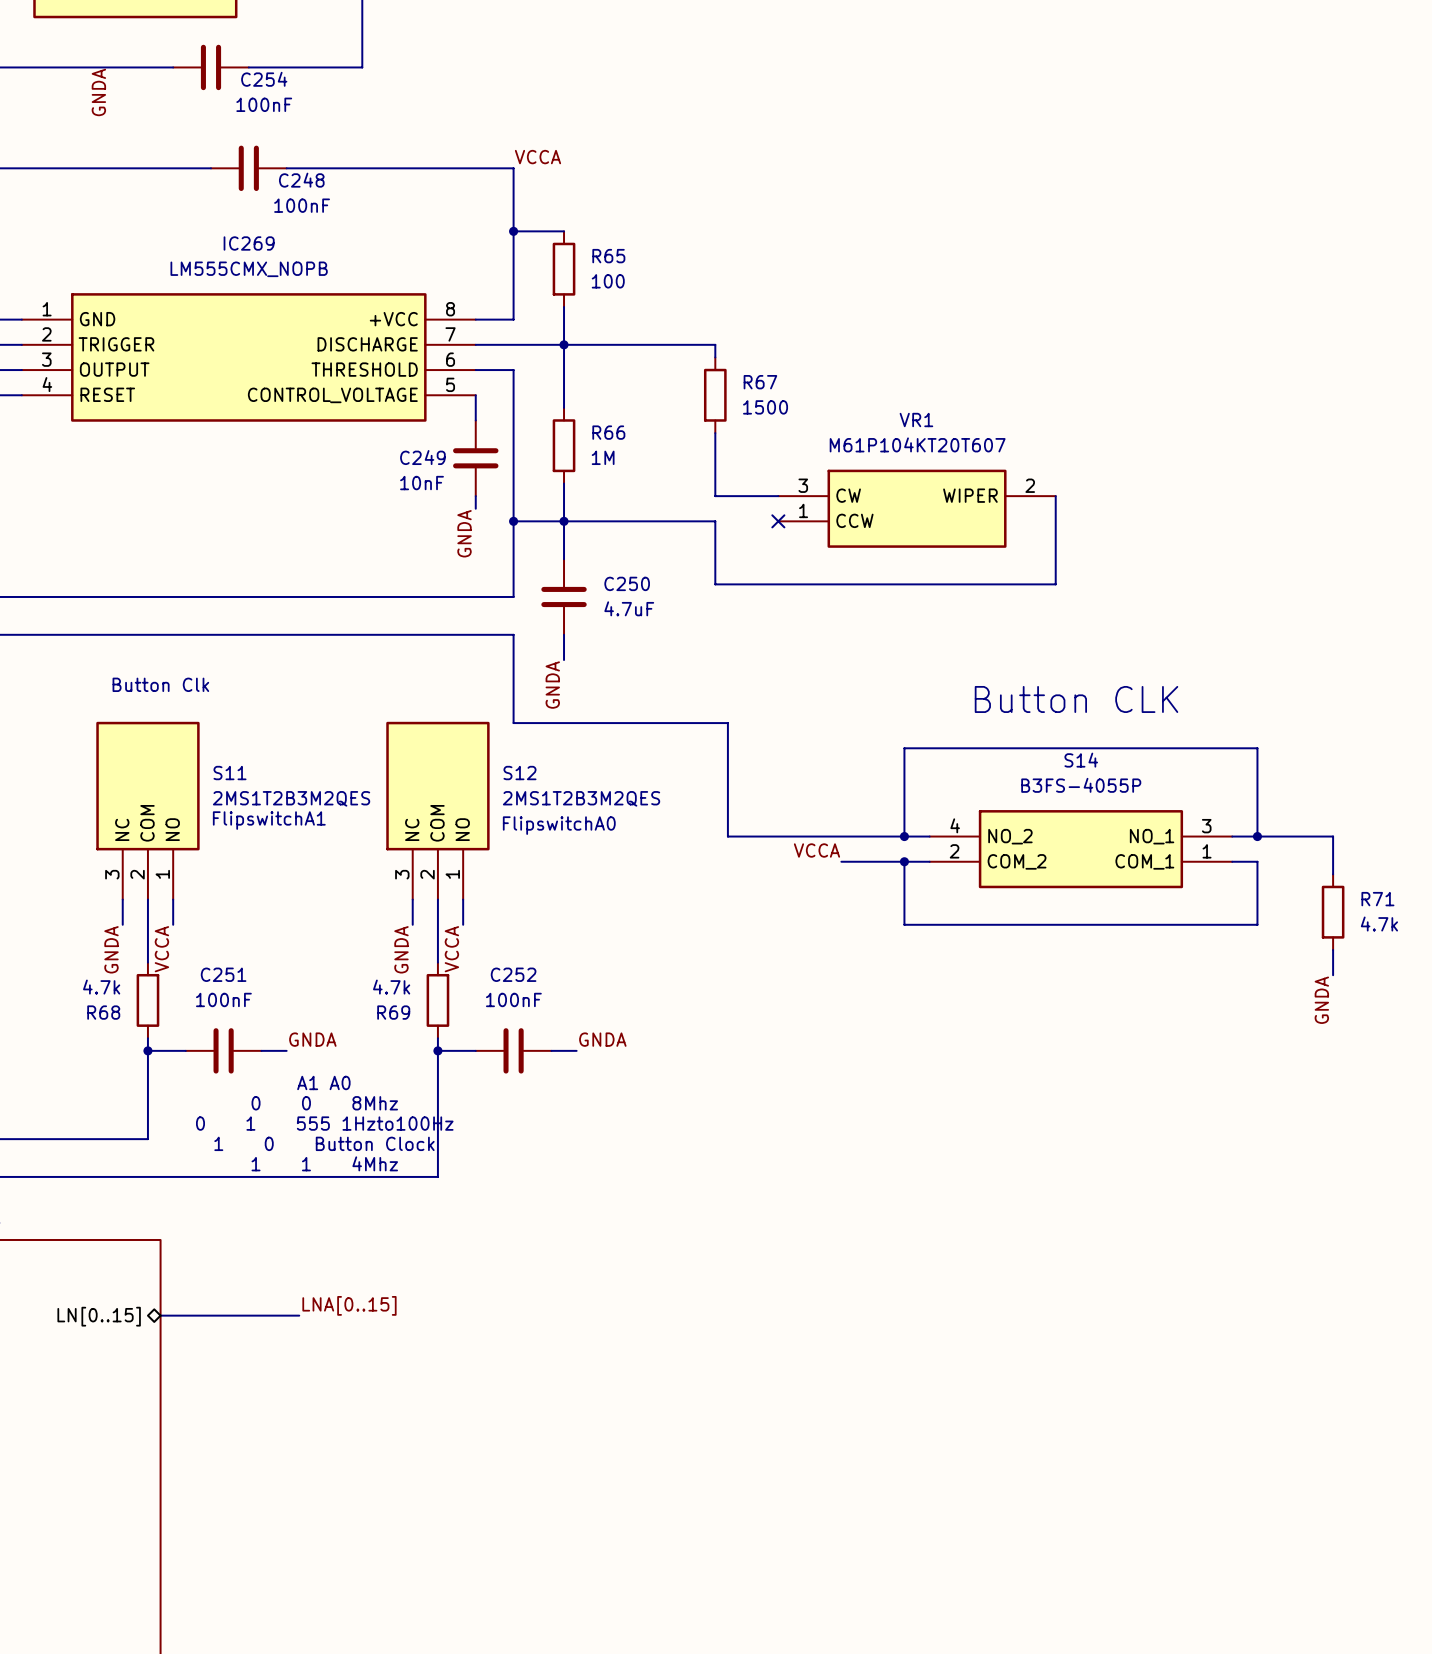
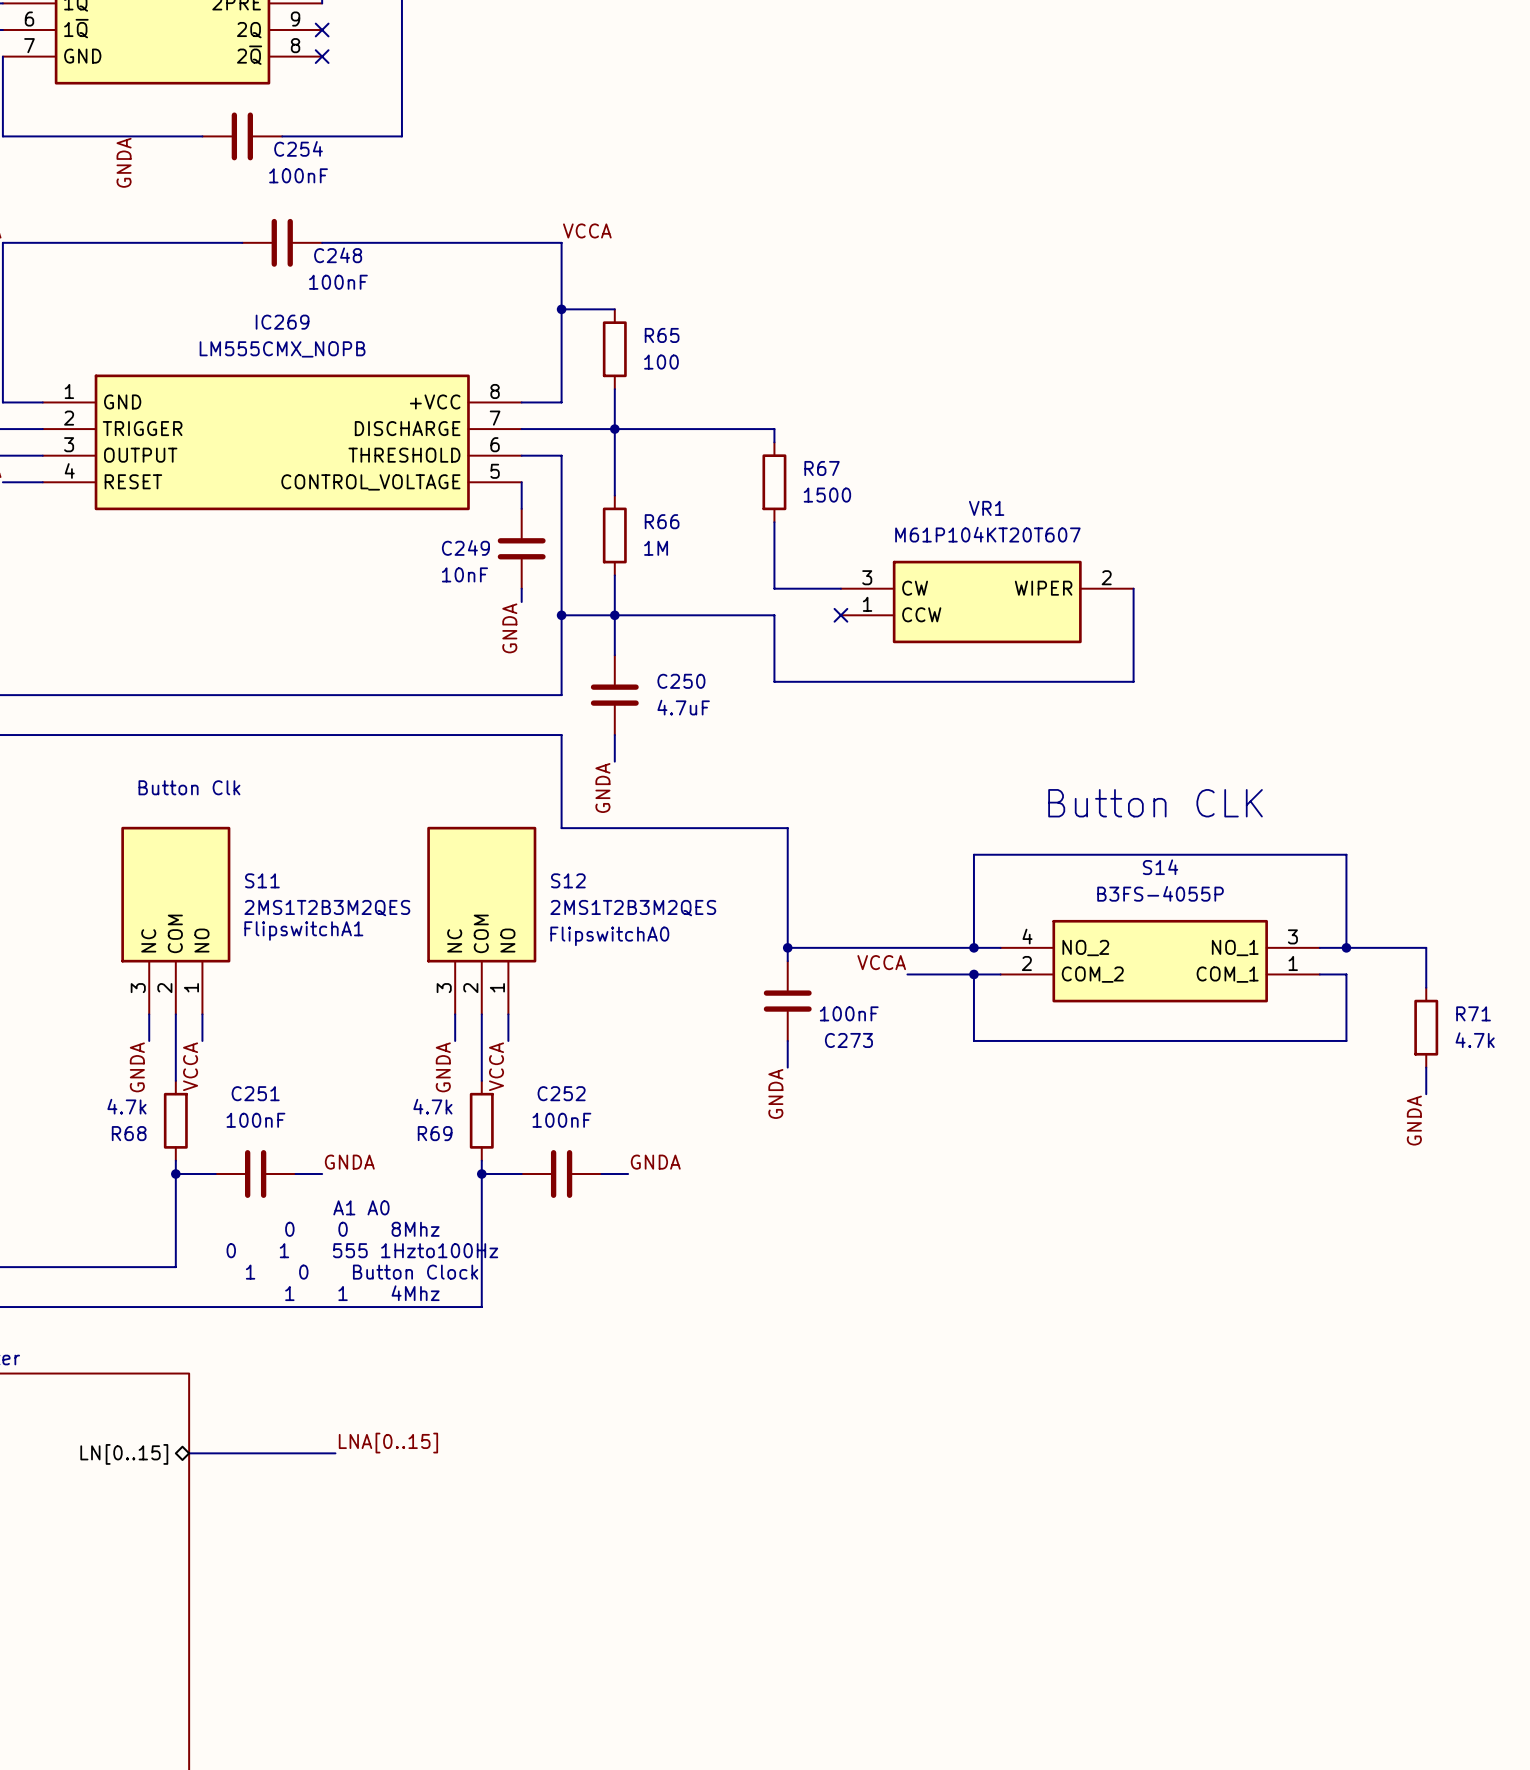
wire: none -> (787, 947) (787, 961)
junction: none -> (787, 947)
C273: none -> 100nF (787, 1001)
wire: none -> (787, 1040) (787, 1067)
label: none -> GNDA (775, 1093)

